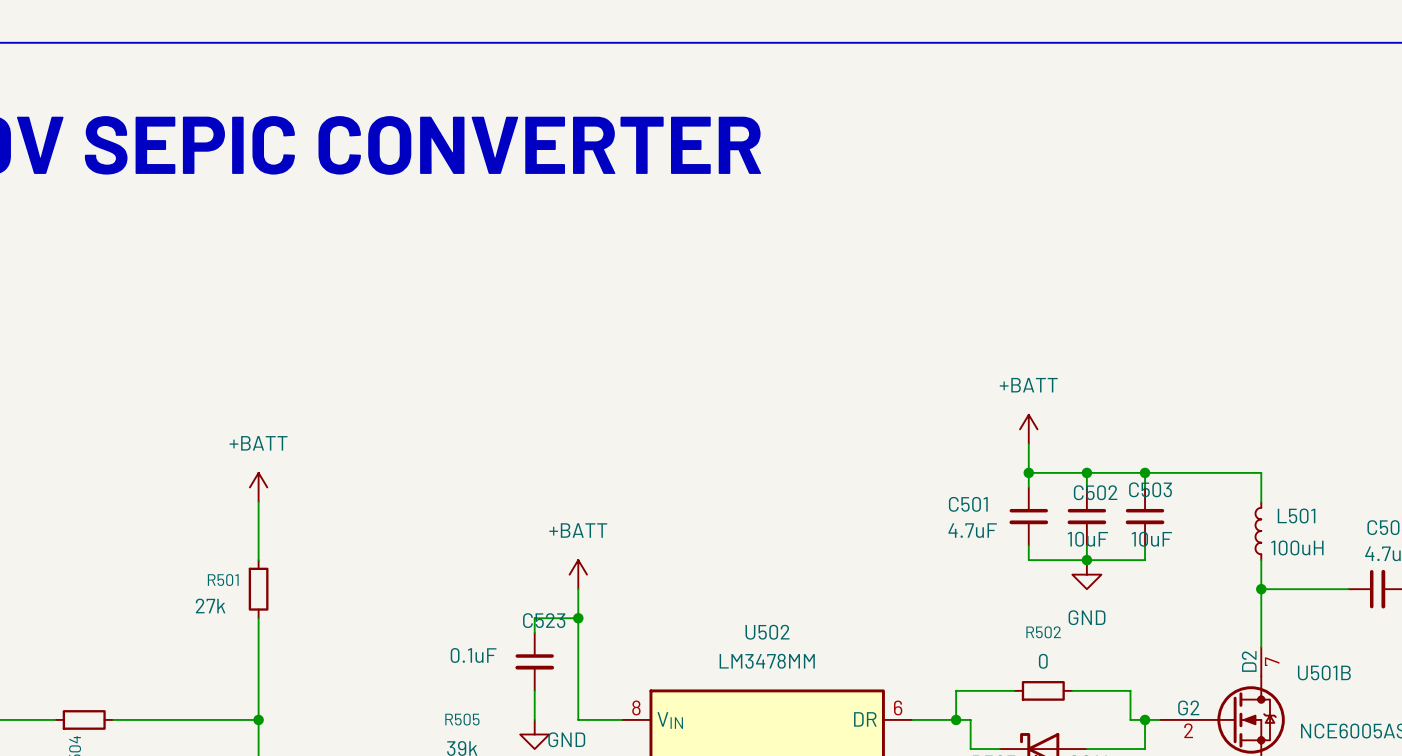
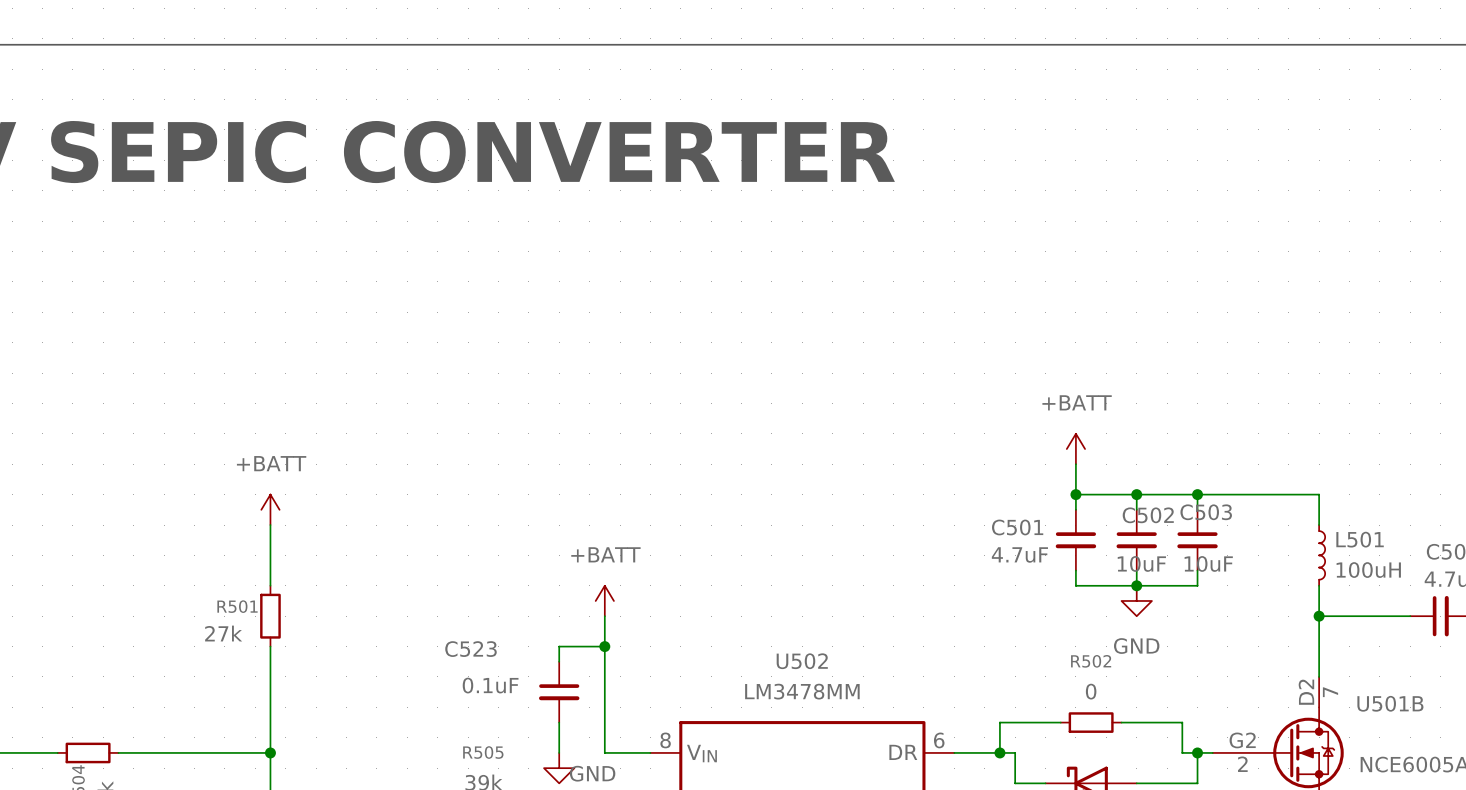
L501 rotation: 0° (1258, 531) -> 180° (1322, 555)
C523 name position: C523 (544, 620) -> C523 (471, 649)

